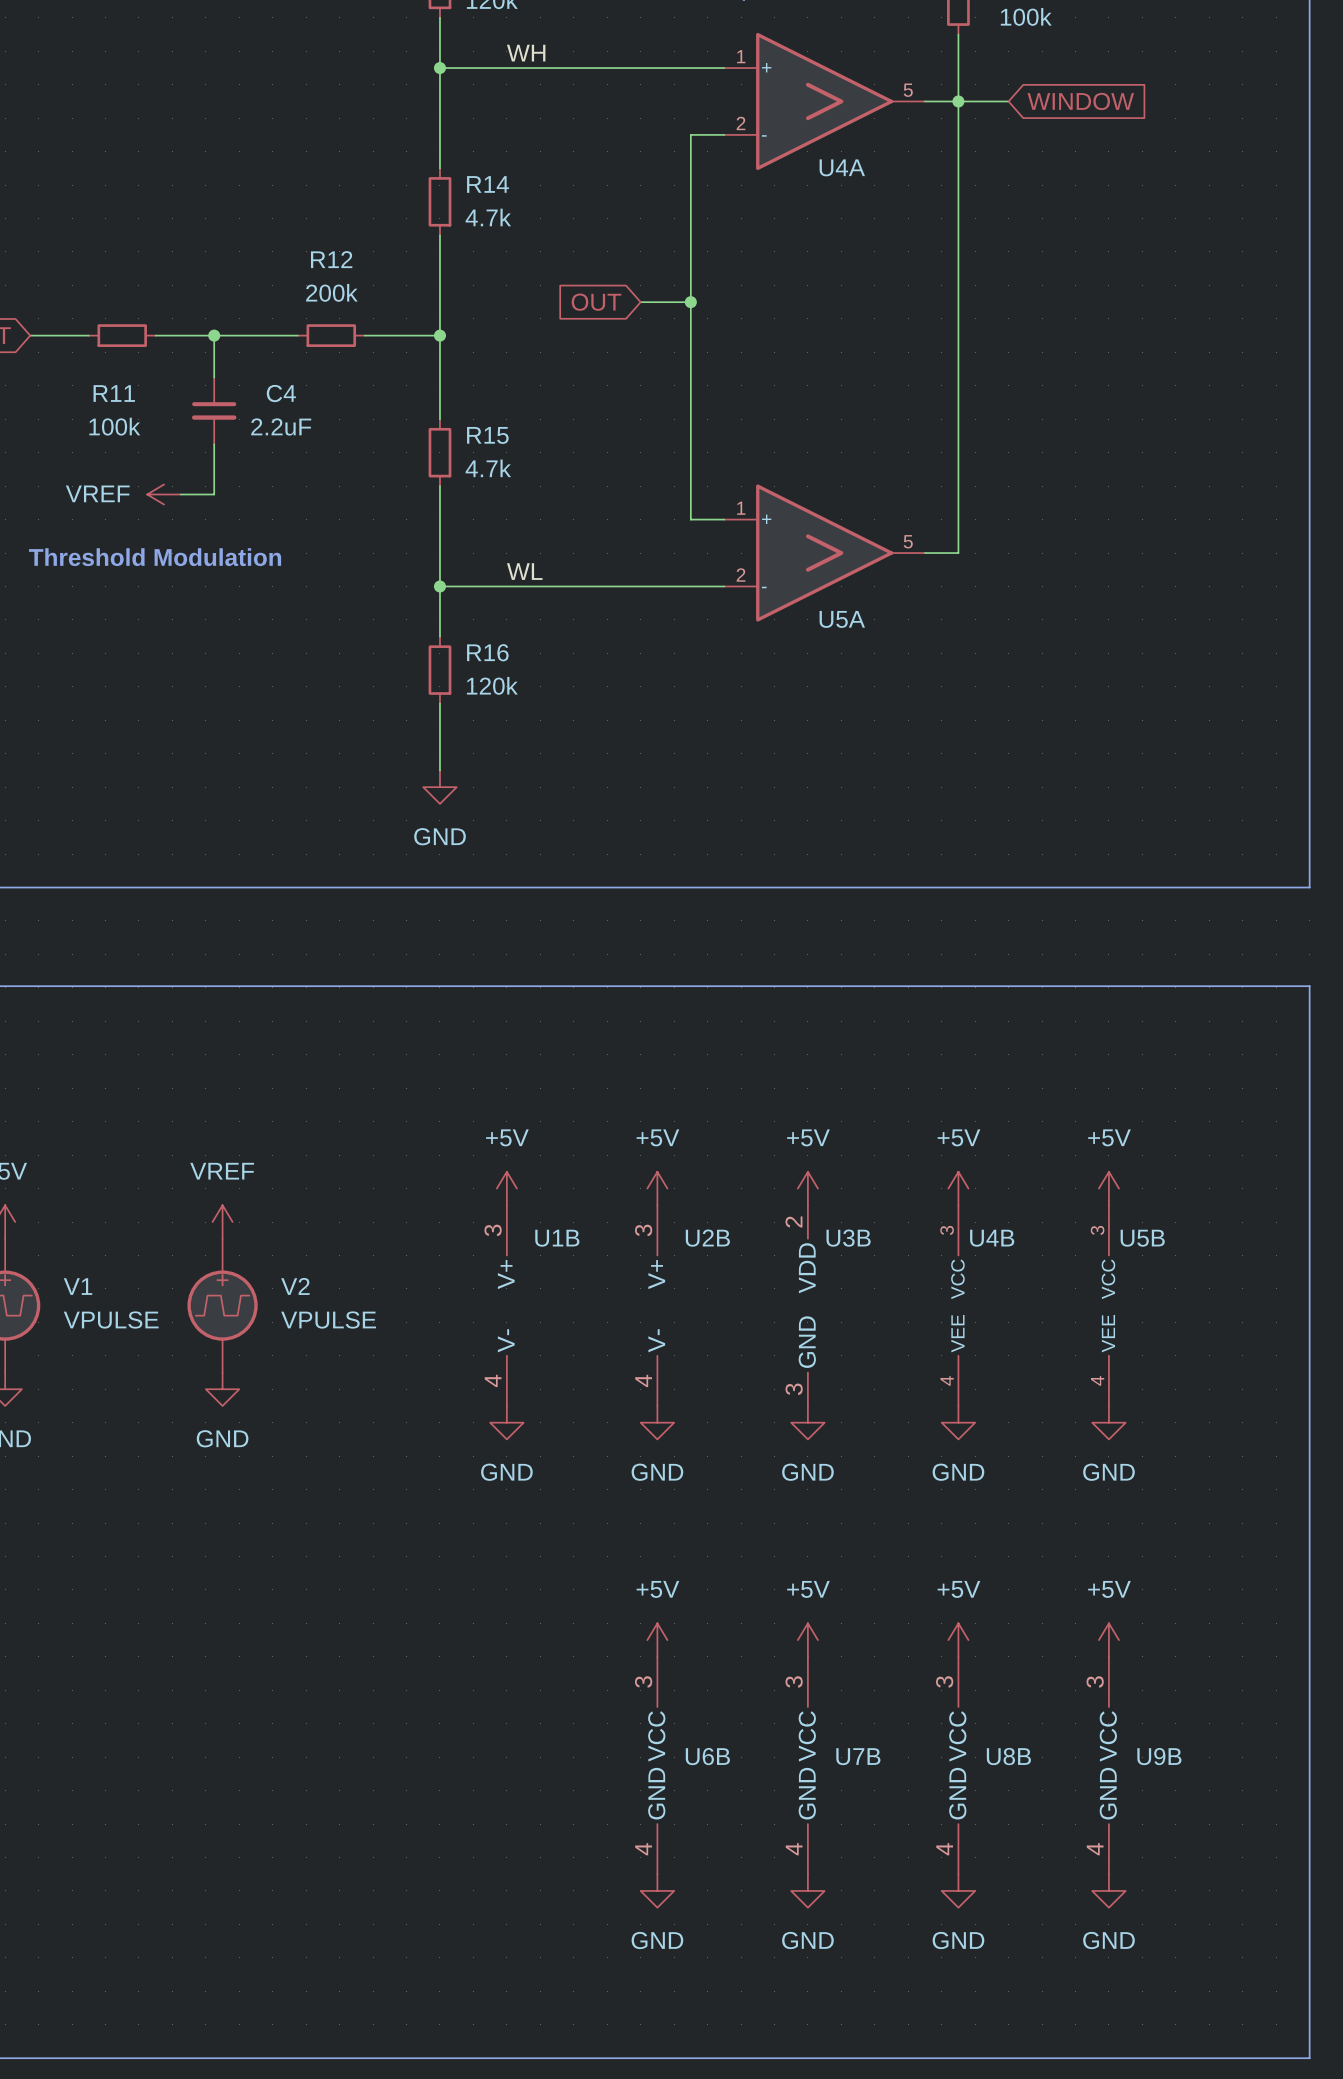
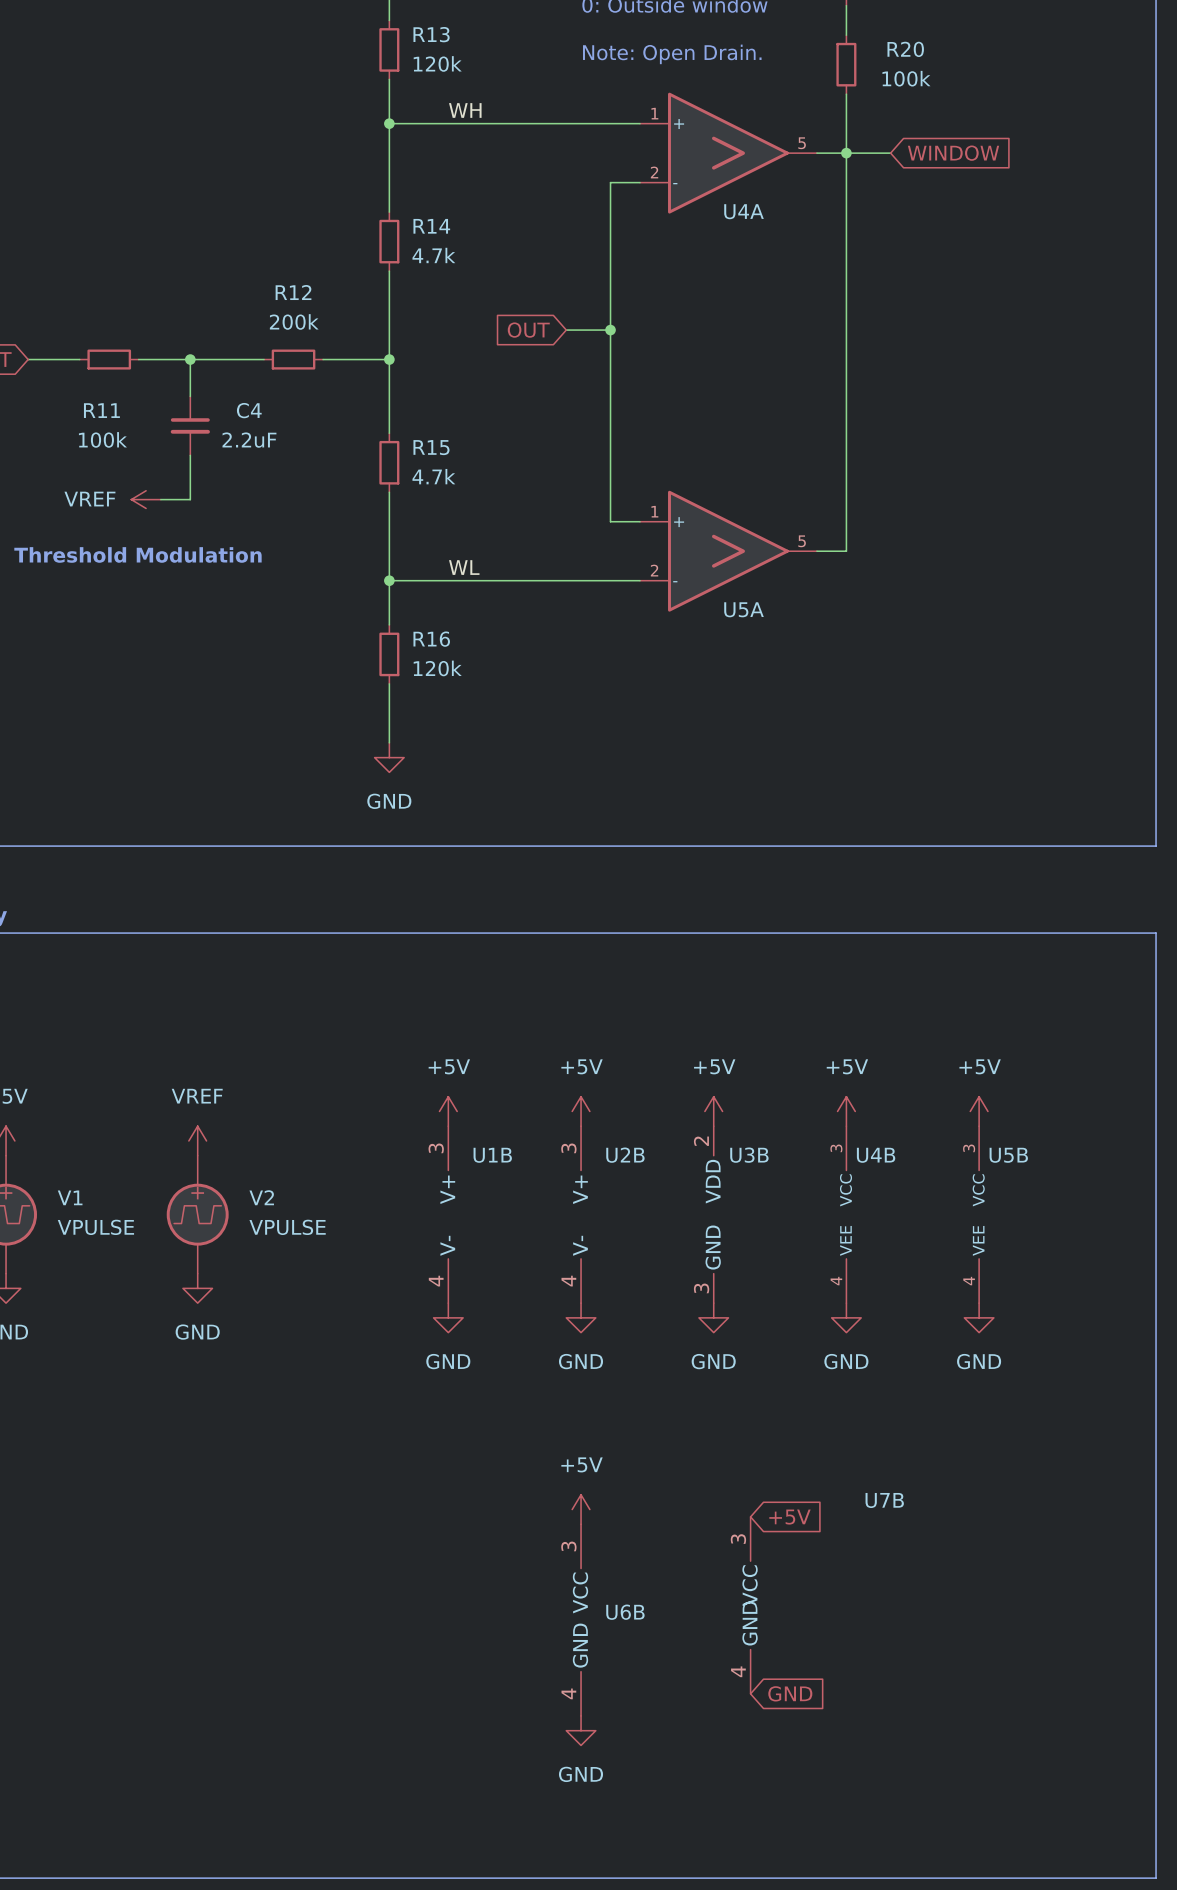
power symbol: +5V (807, 1640) -> none
power symbol: +5V (958, 1640) -> none
power symbol: +5V (1108, 1640) -> none
global label: none -> +5V (789, 1517)
U7B symbol: [807, 1656, 808, 1875] -> [750, 1516, 751, 1694]
U7B name position: U7B (858, 1756) -> U7B (884, 1500)
U8B: (958, 1765) -> none
U9B: (1108, 1765) -> none
global label: none -> GND (790, 1693)
power symbol: GND (807, 1890) -> none
power symbol: GND (958, 1890) -> none
power symbol: GND (1108, 1890) -> none

